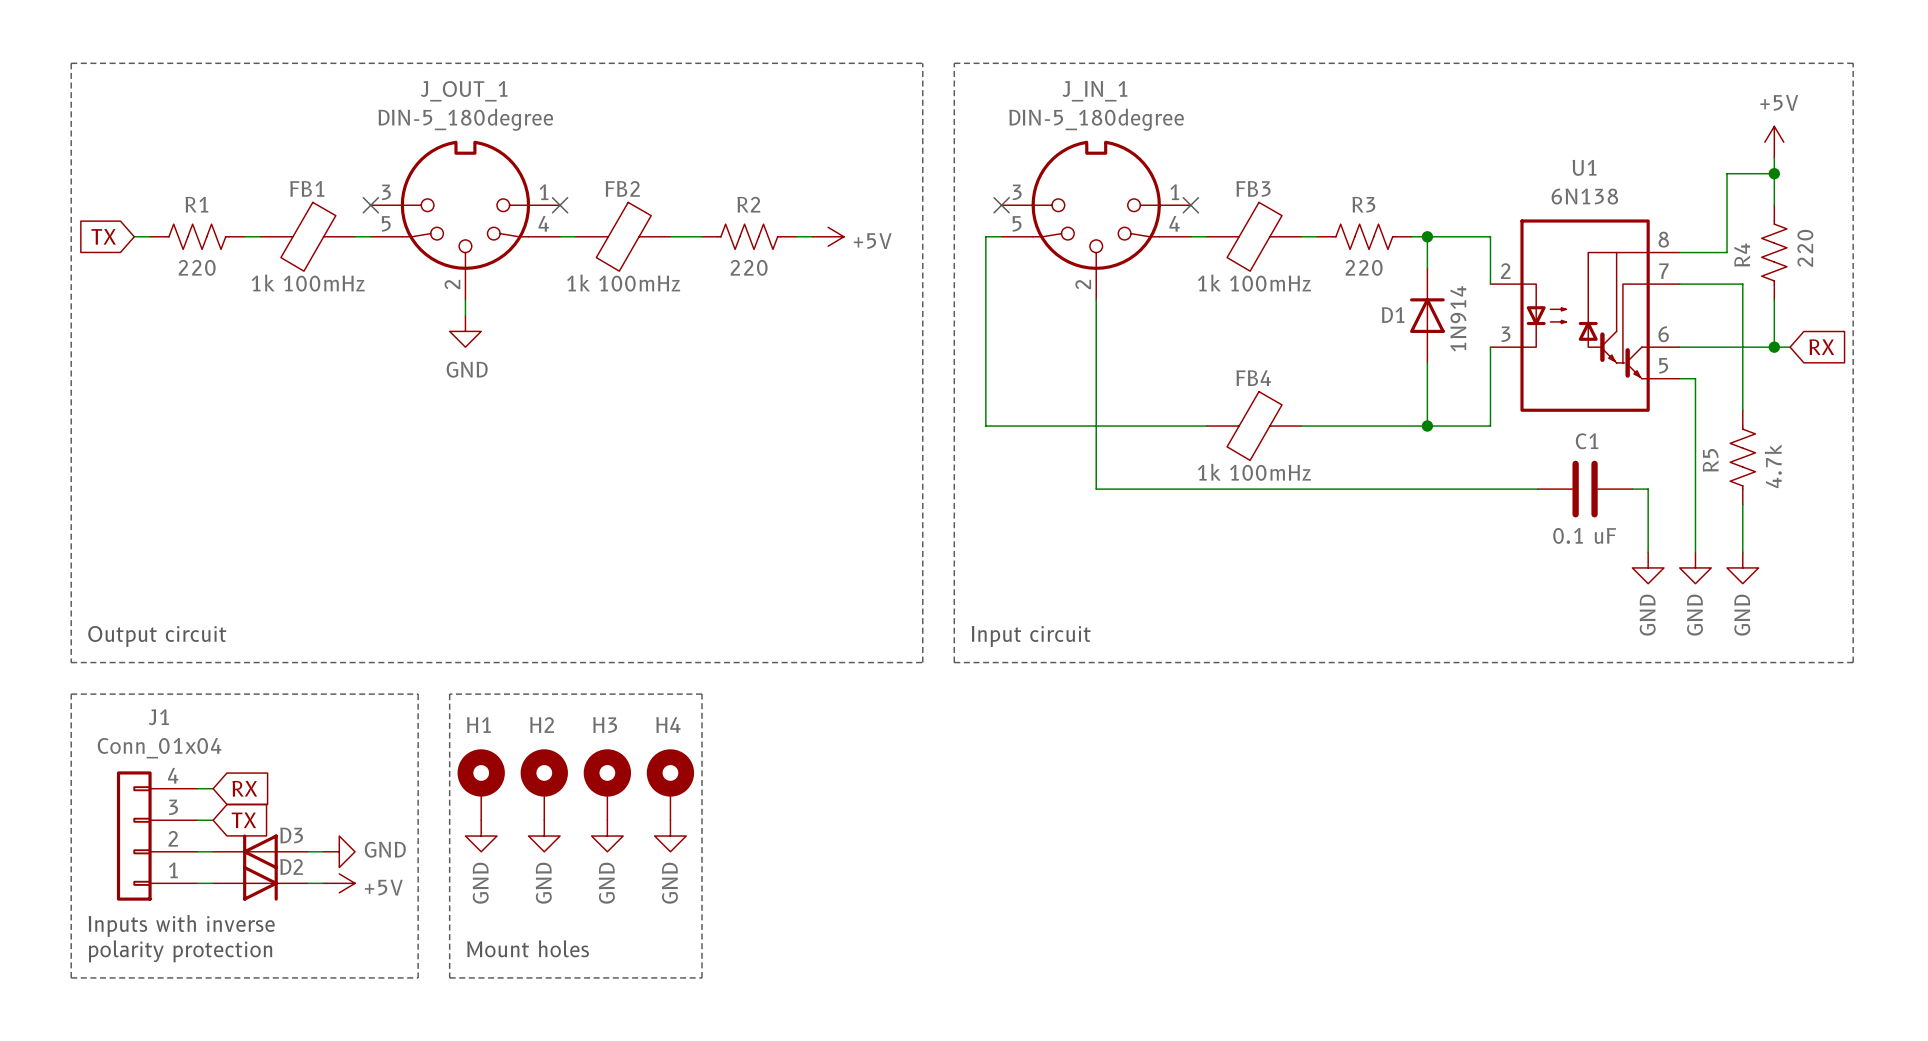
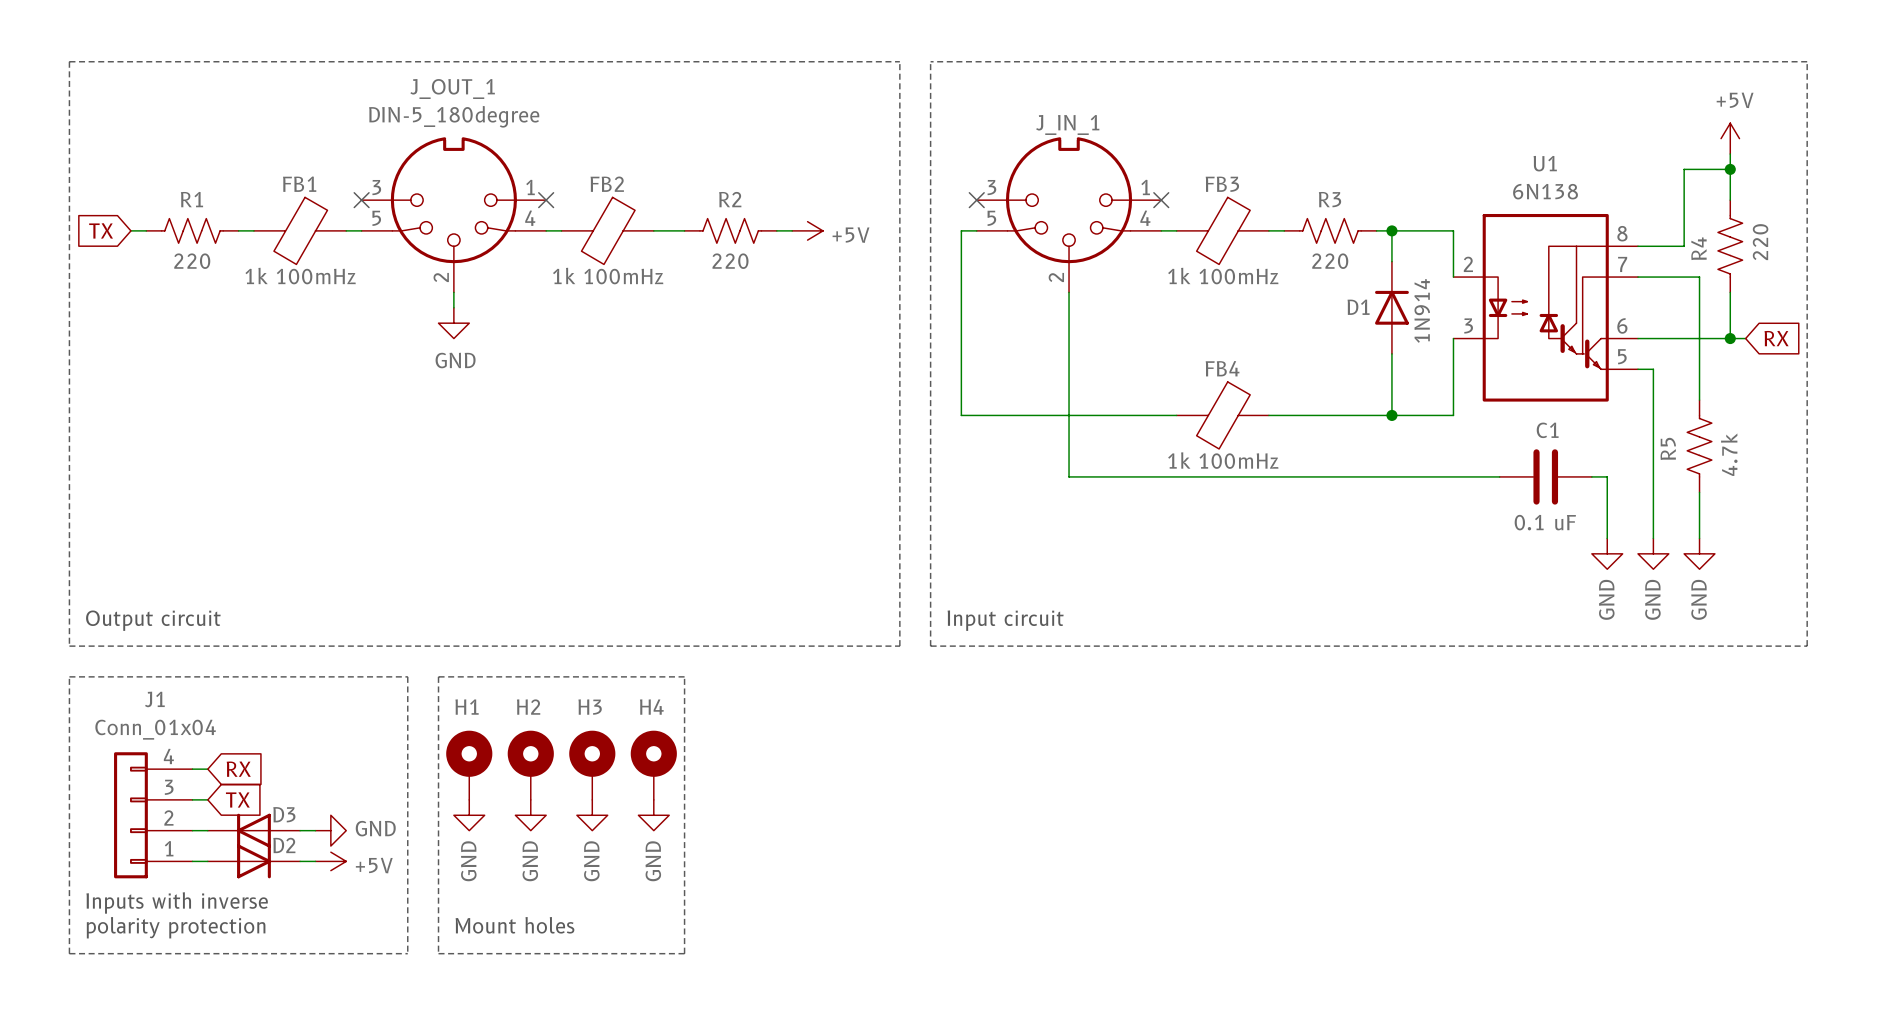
J_IN_1 name position: J_IN_1 (1094, 91) -> J_IN_1 (1067, 124)
J_IN_1 value: DIN-5_180degree (1096, 119) -> none

